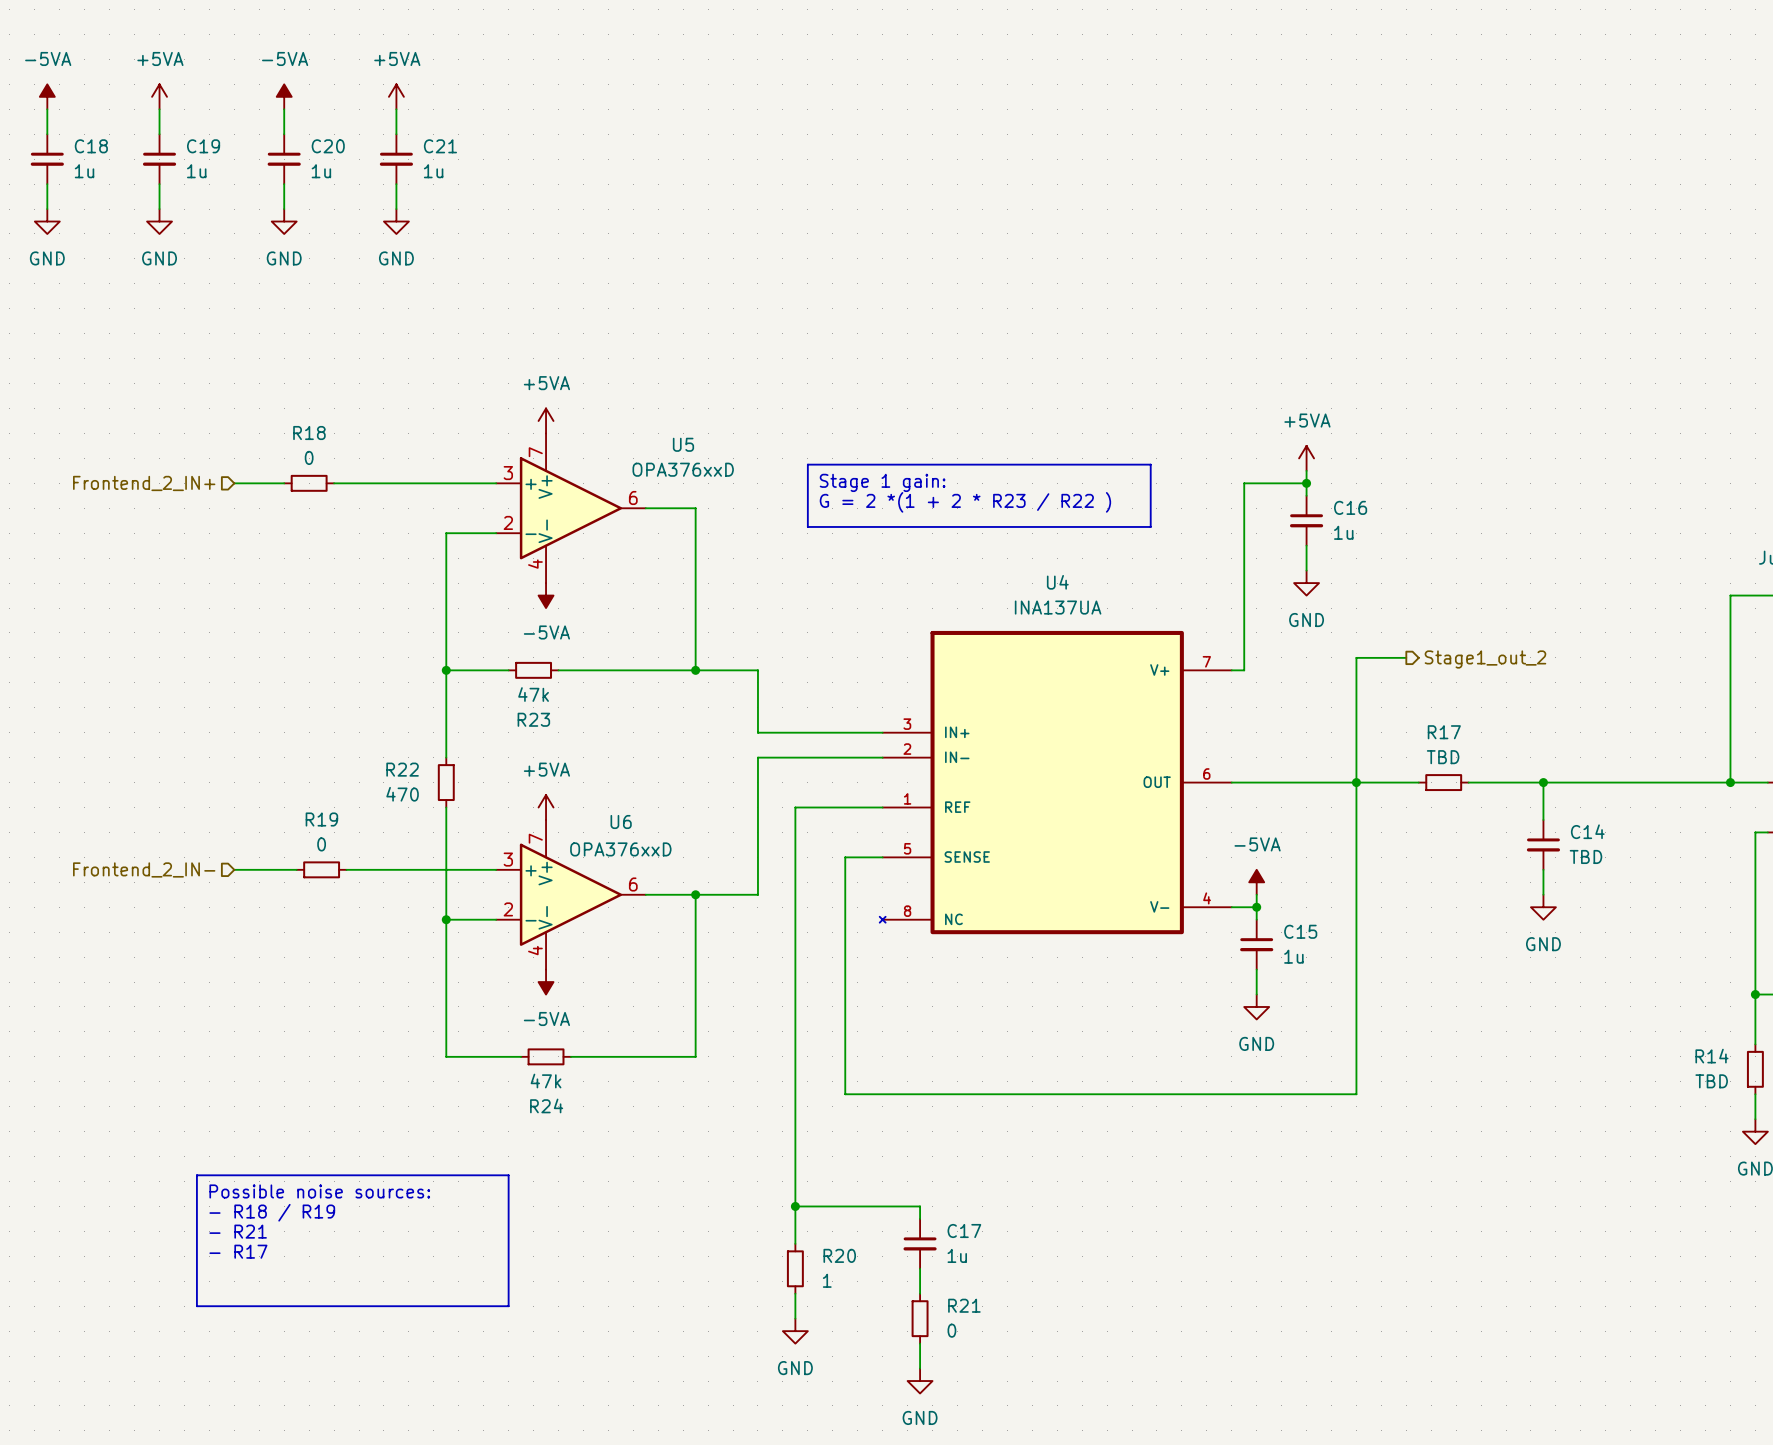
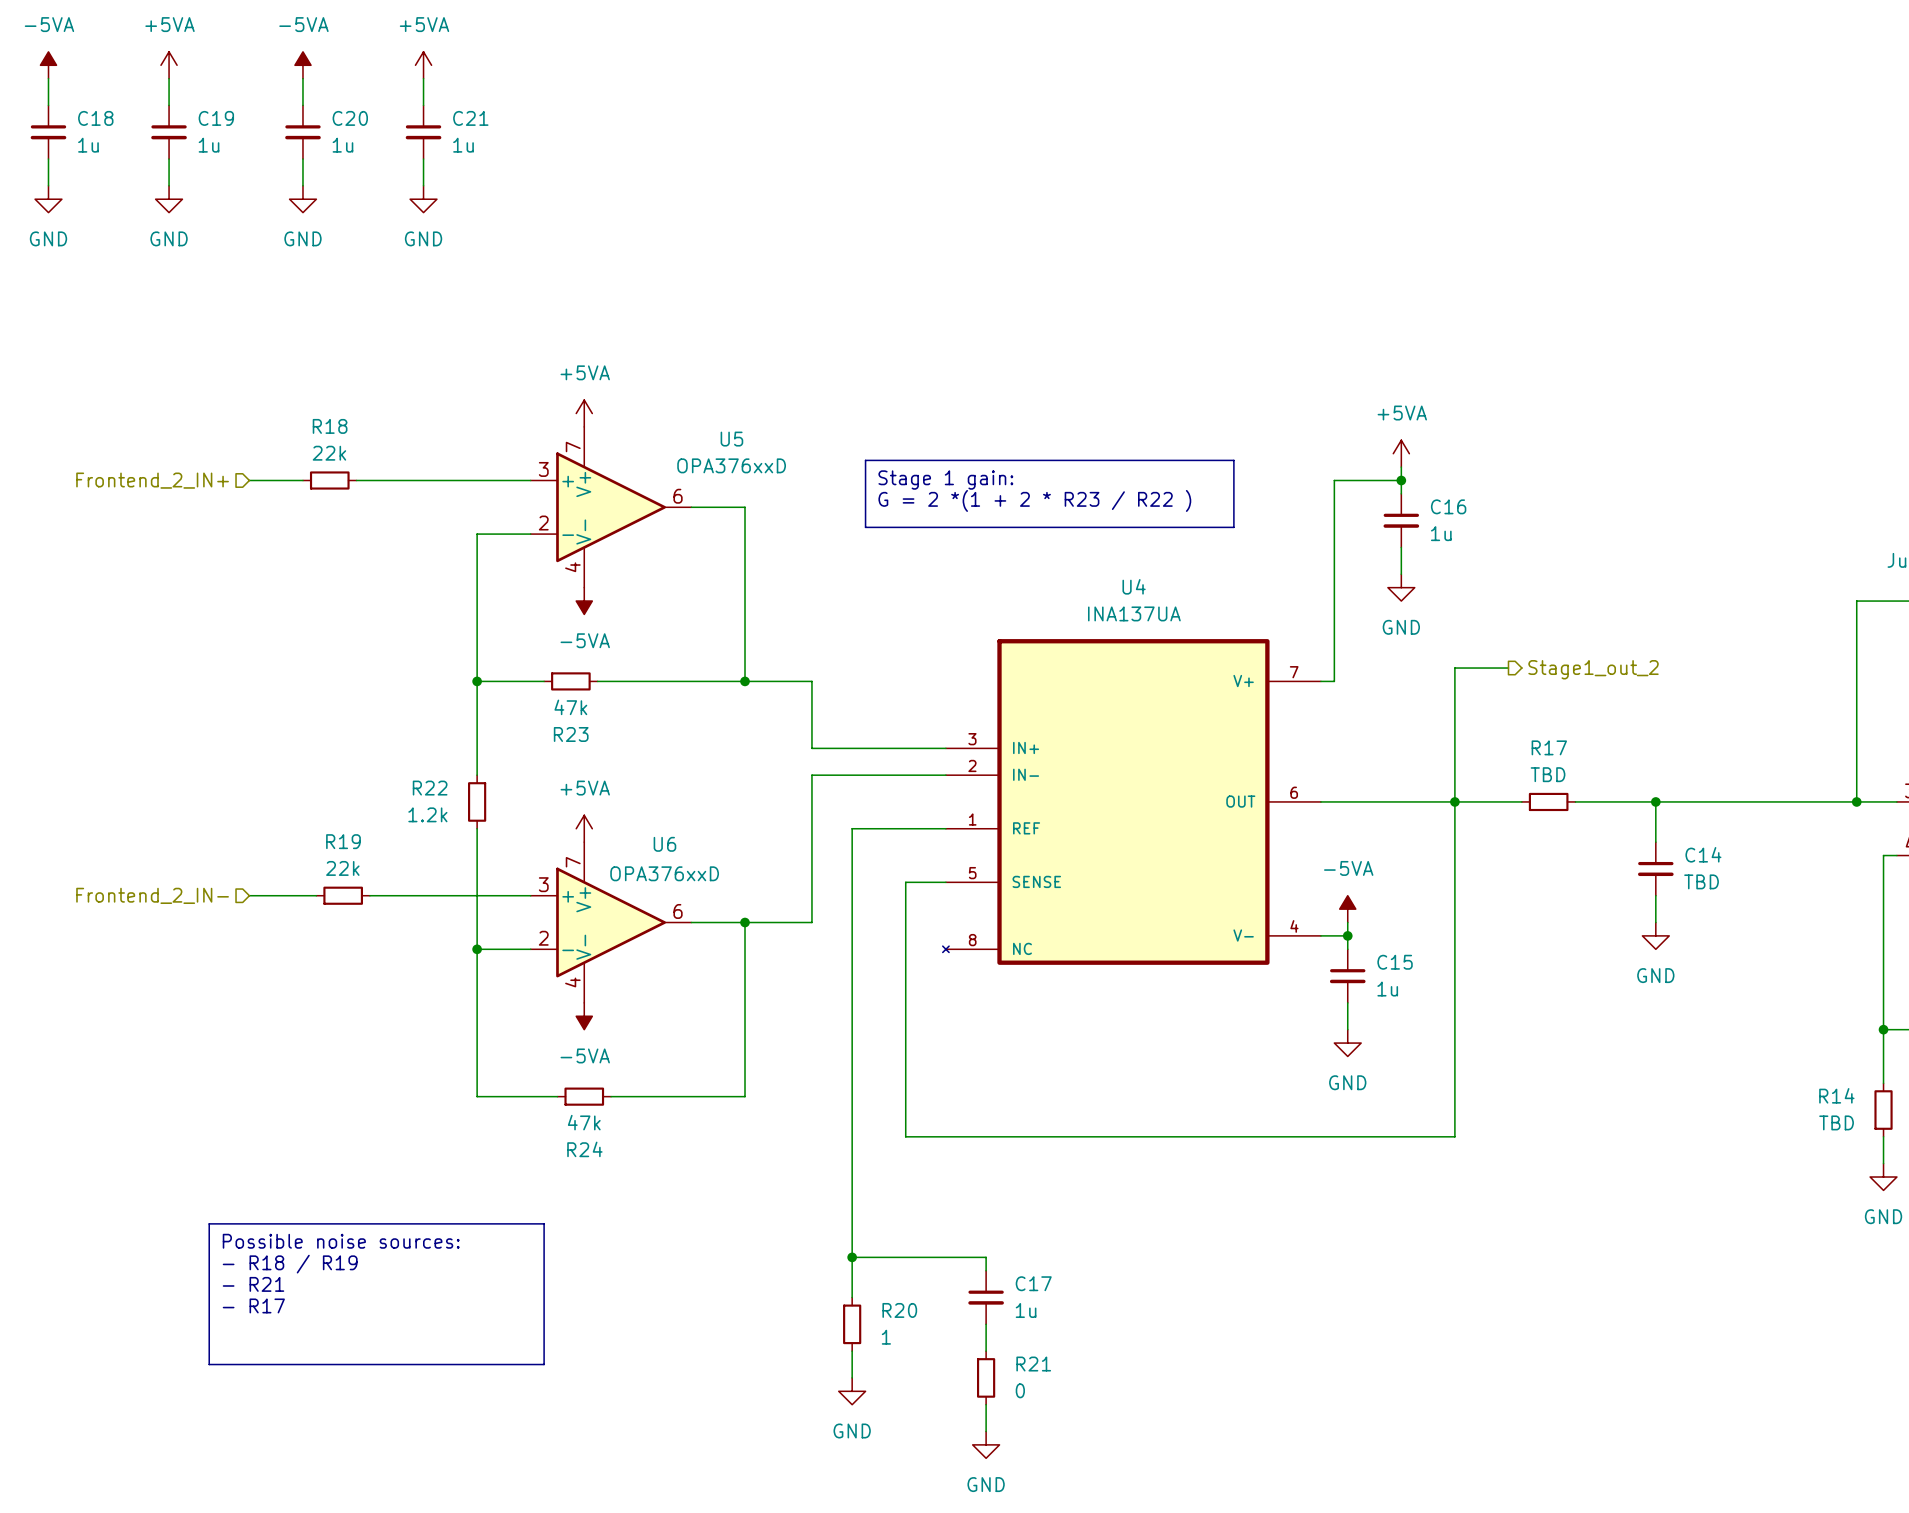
R18 value: 0 (309, 457) -> 22k (329, 453)
R22 value: 470 (402, 794) -> 1.2k (427, 814)
R19 value: 0 (321, 844) -> 22k (342, 868)

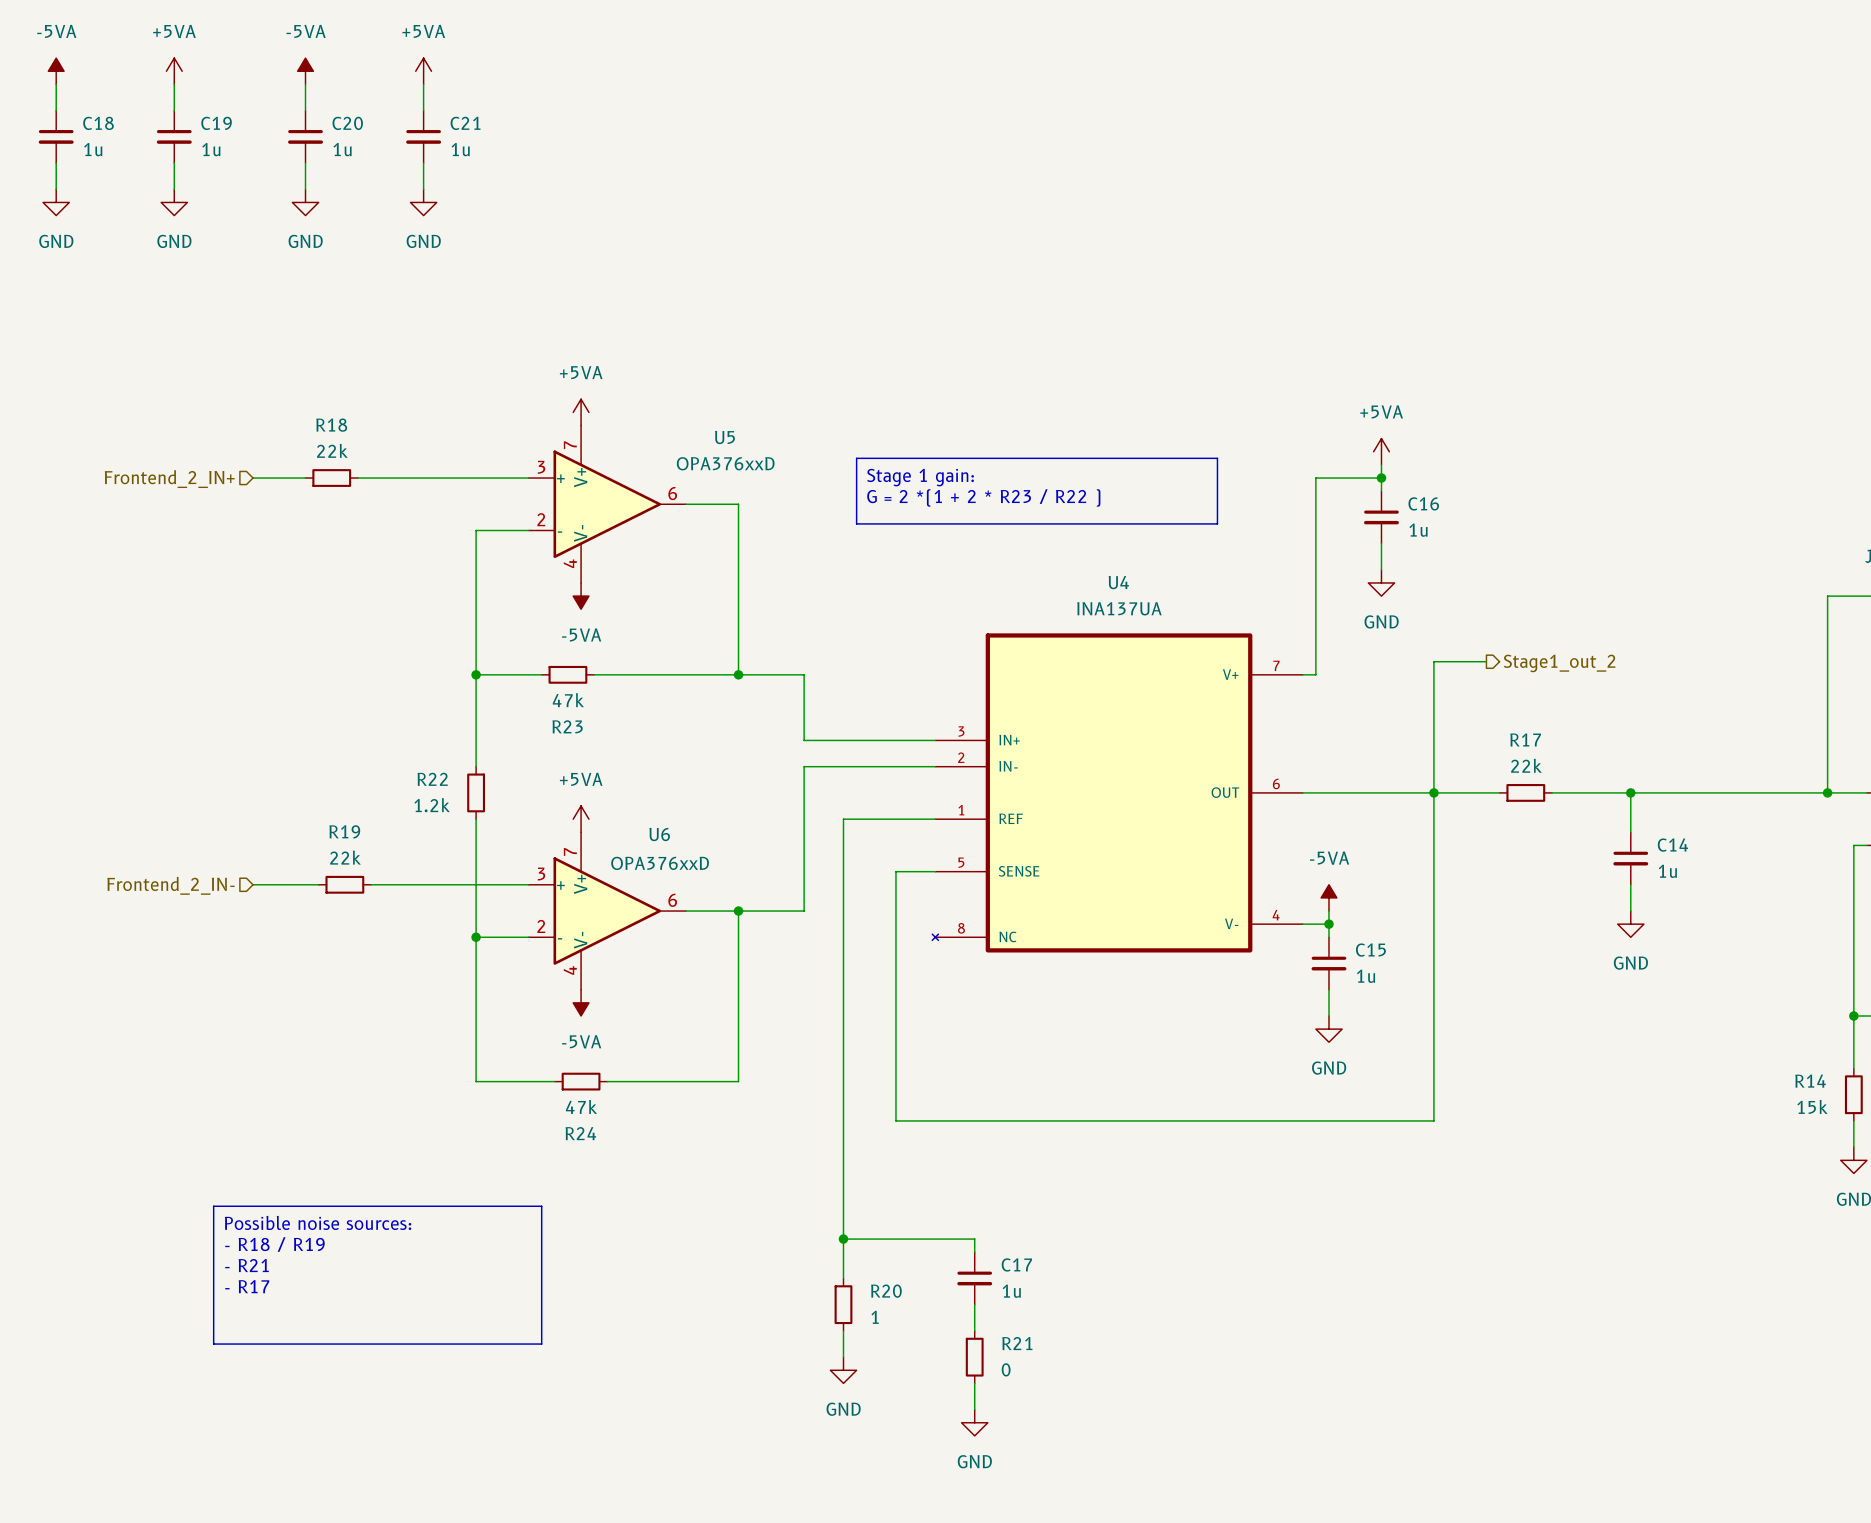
R17 value: TBD (1548, 774) -> 22k (1526, 765)
C14 value: TBD (1701, 881) -> 1u (1667, 871)
R14 value: TBD (1836, 1122) -> 15k (1812, 1106)

